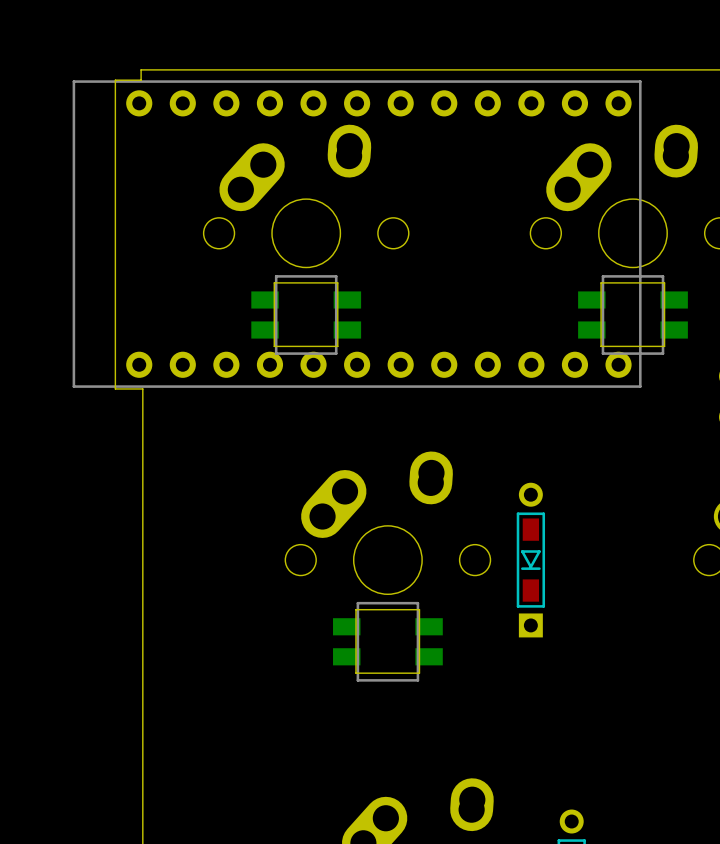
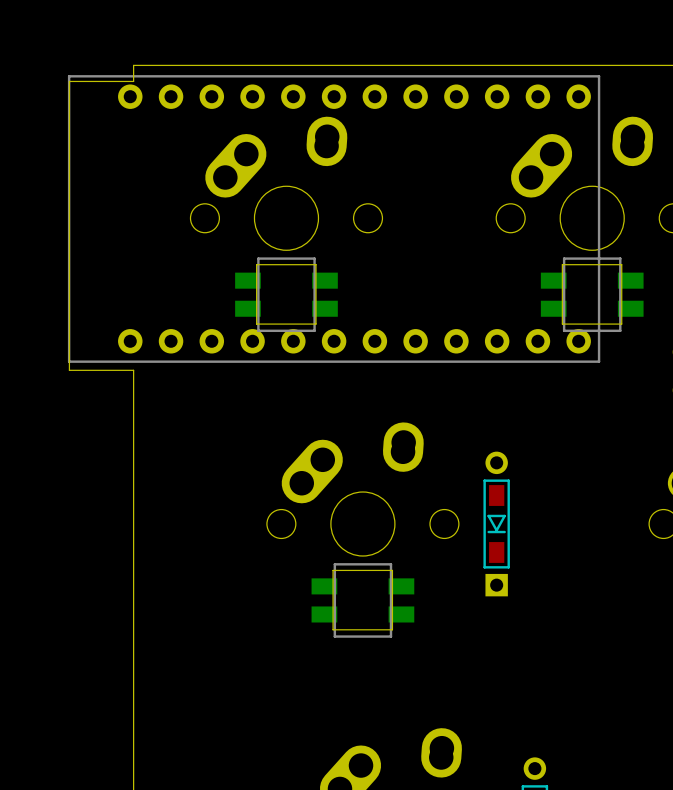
board edge: (142, 69) (141, 69) (141, 80) (115, 80) (115, 388) (142, 388) (142, 395) -> (133, 65) (133, 81) (69, 81) (69, 370) (133, 370)

